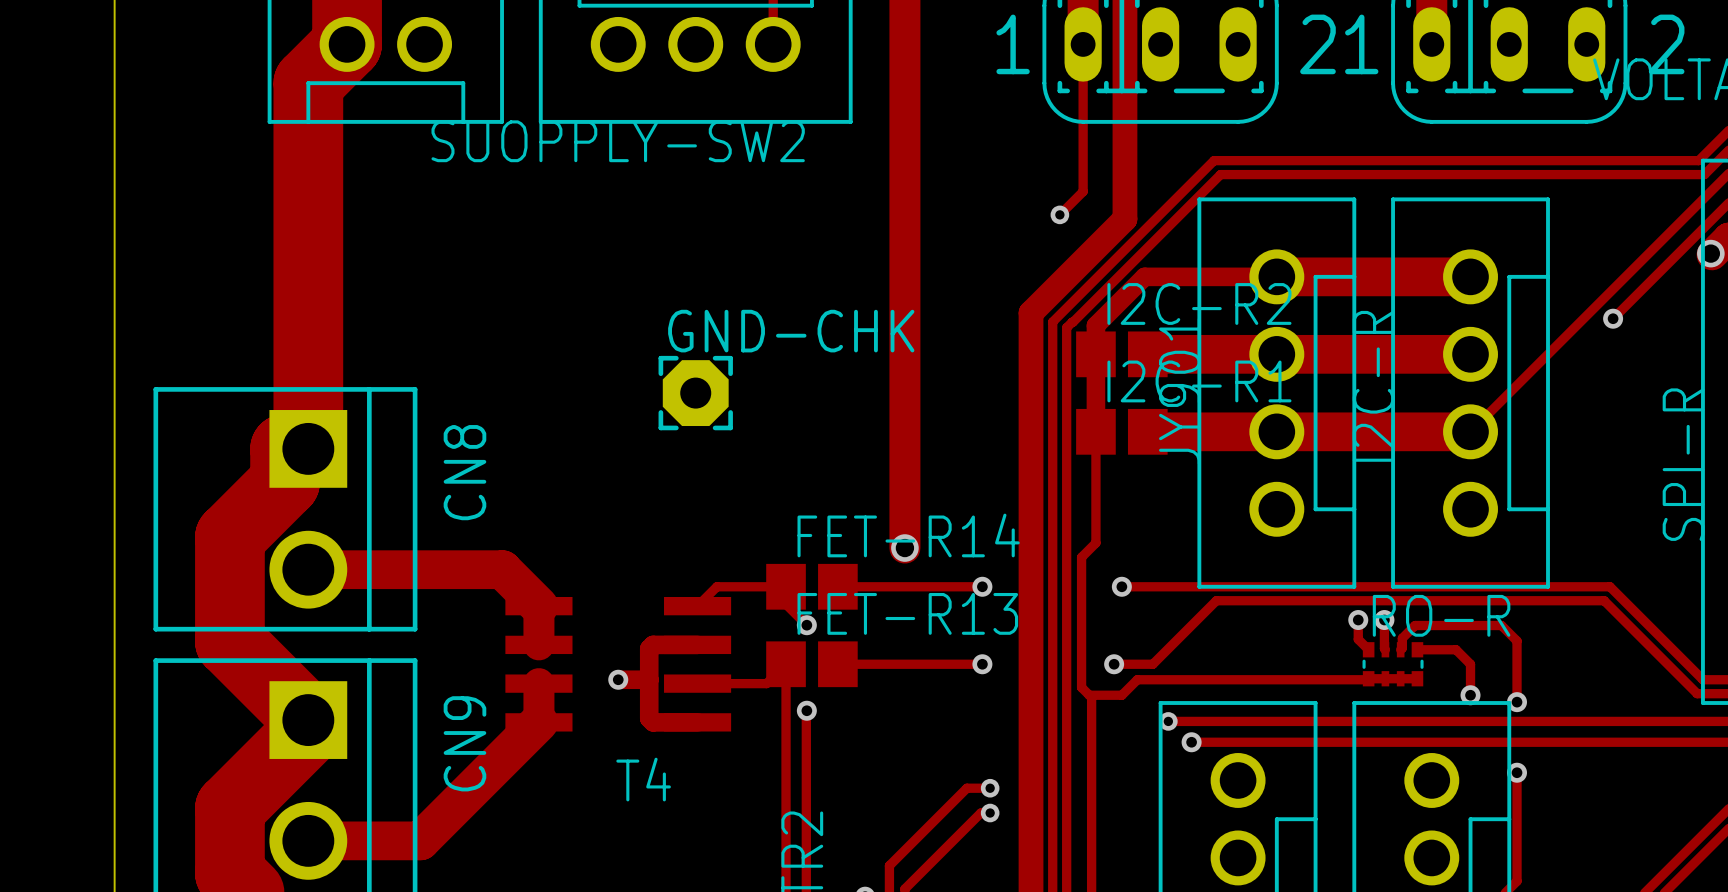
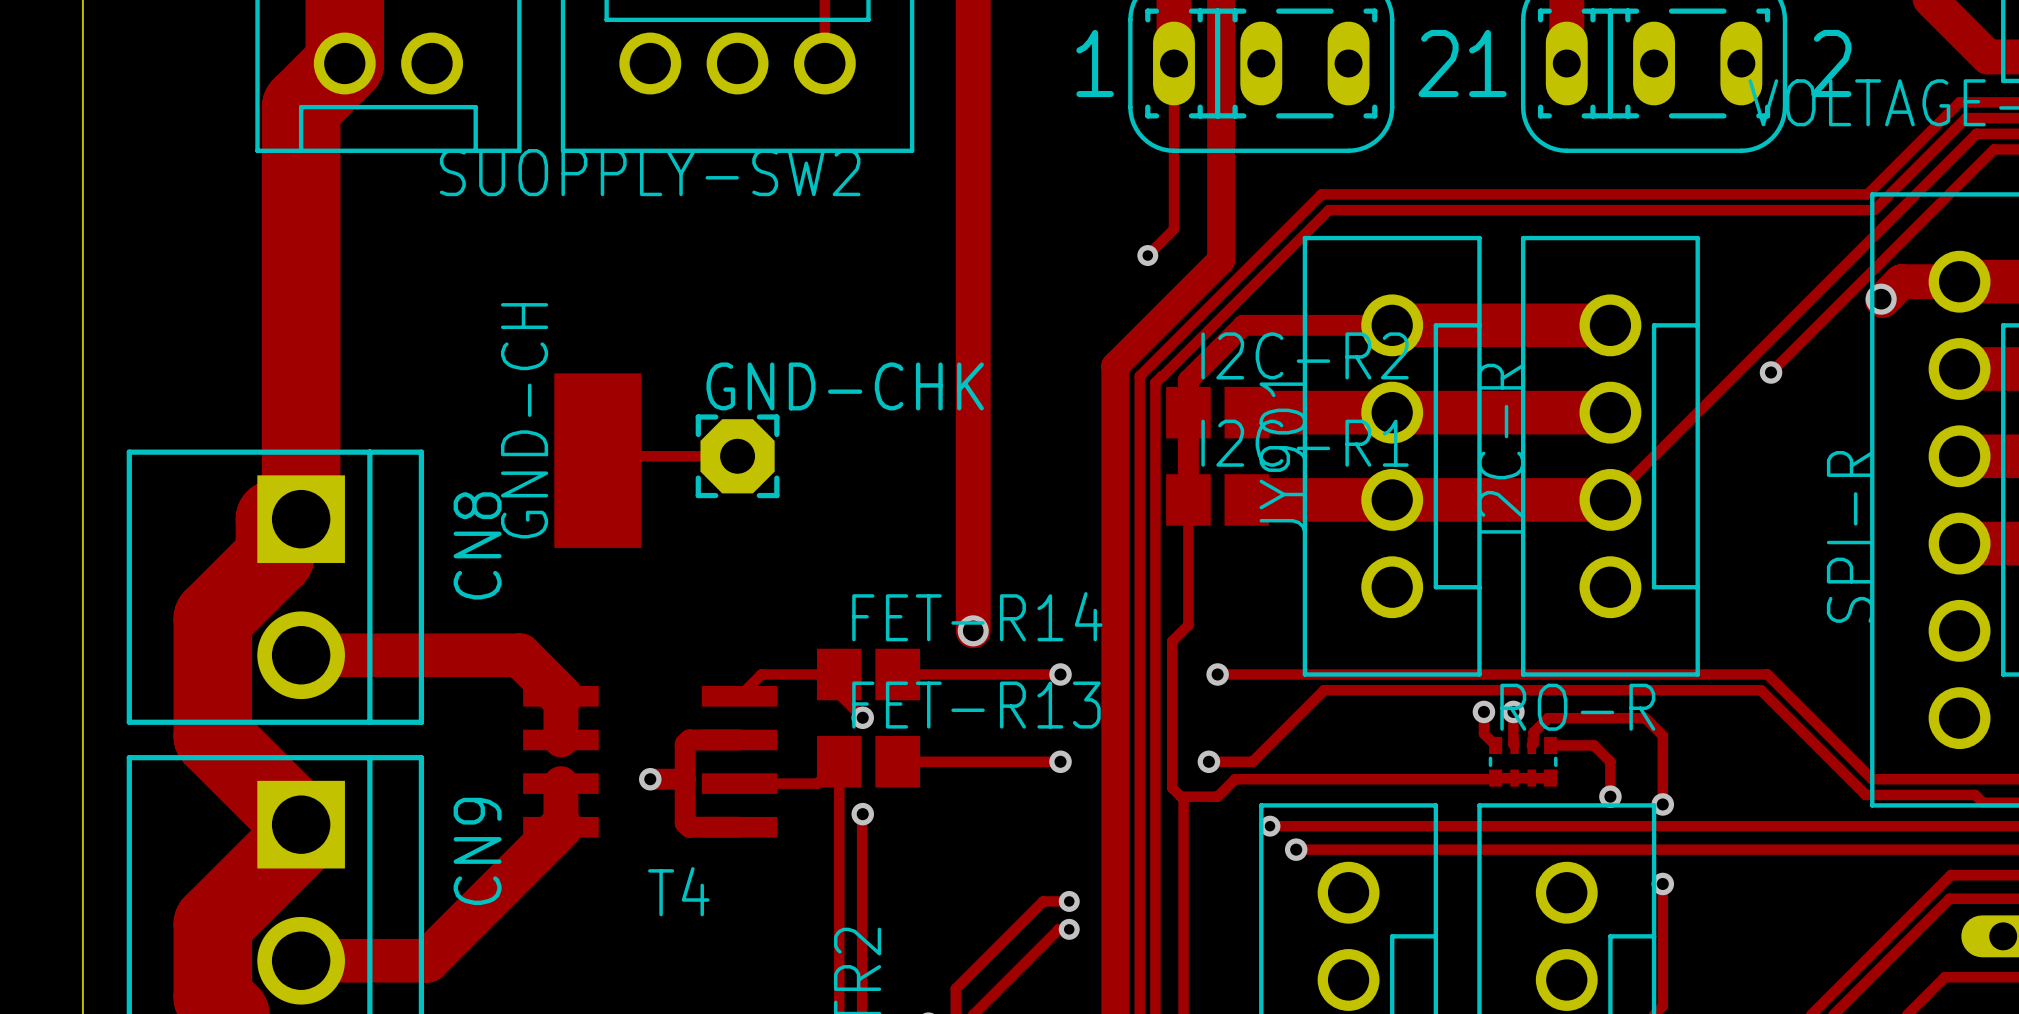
track: none -> (737, 456) (602, 456) (597, 460)
GND-CH: none -> (597, 460)

